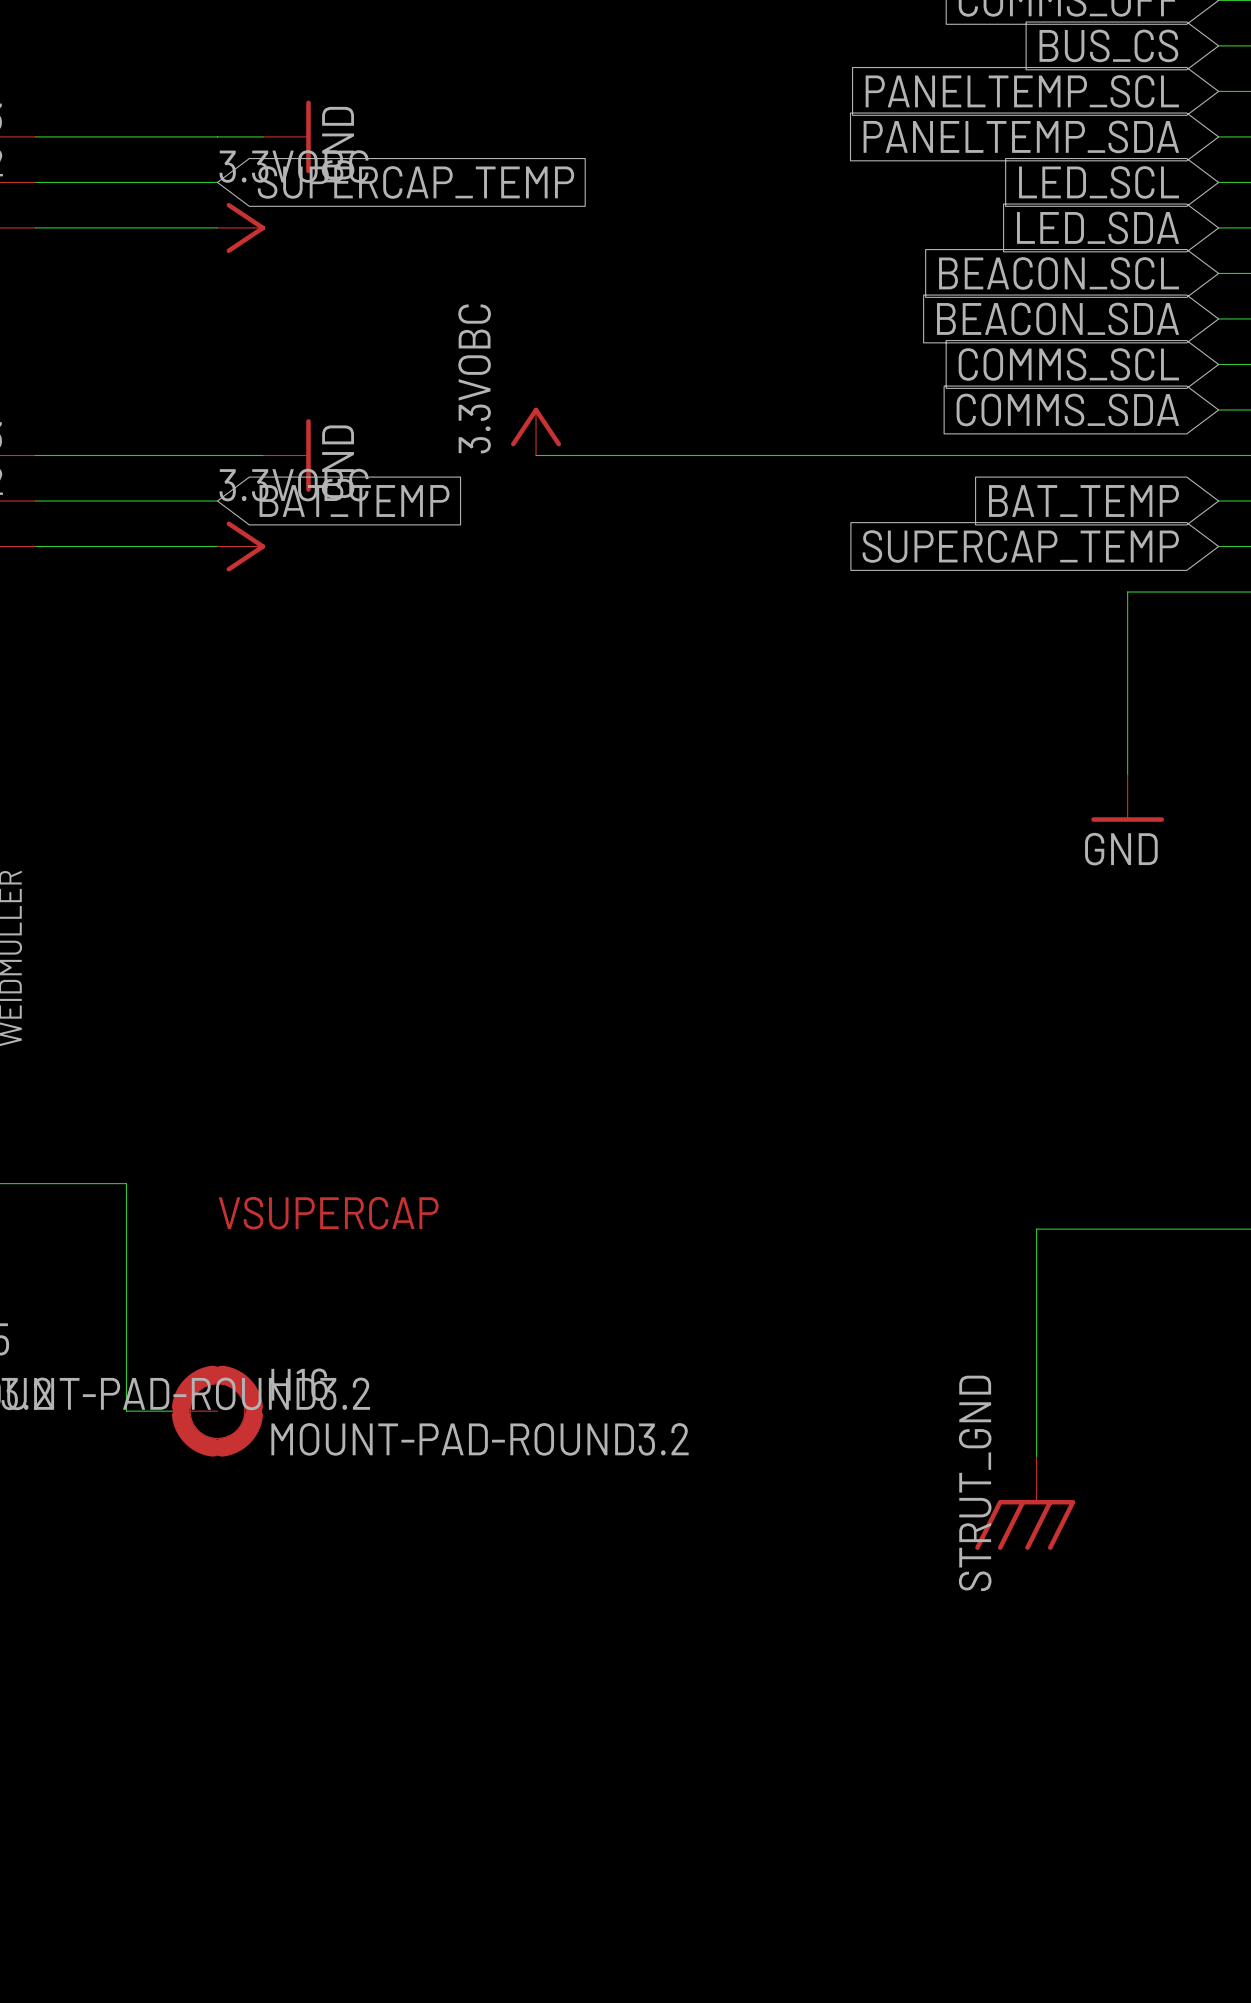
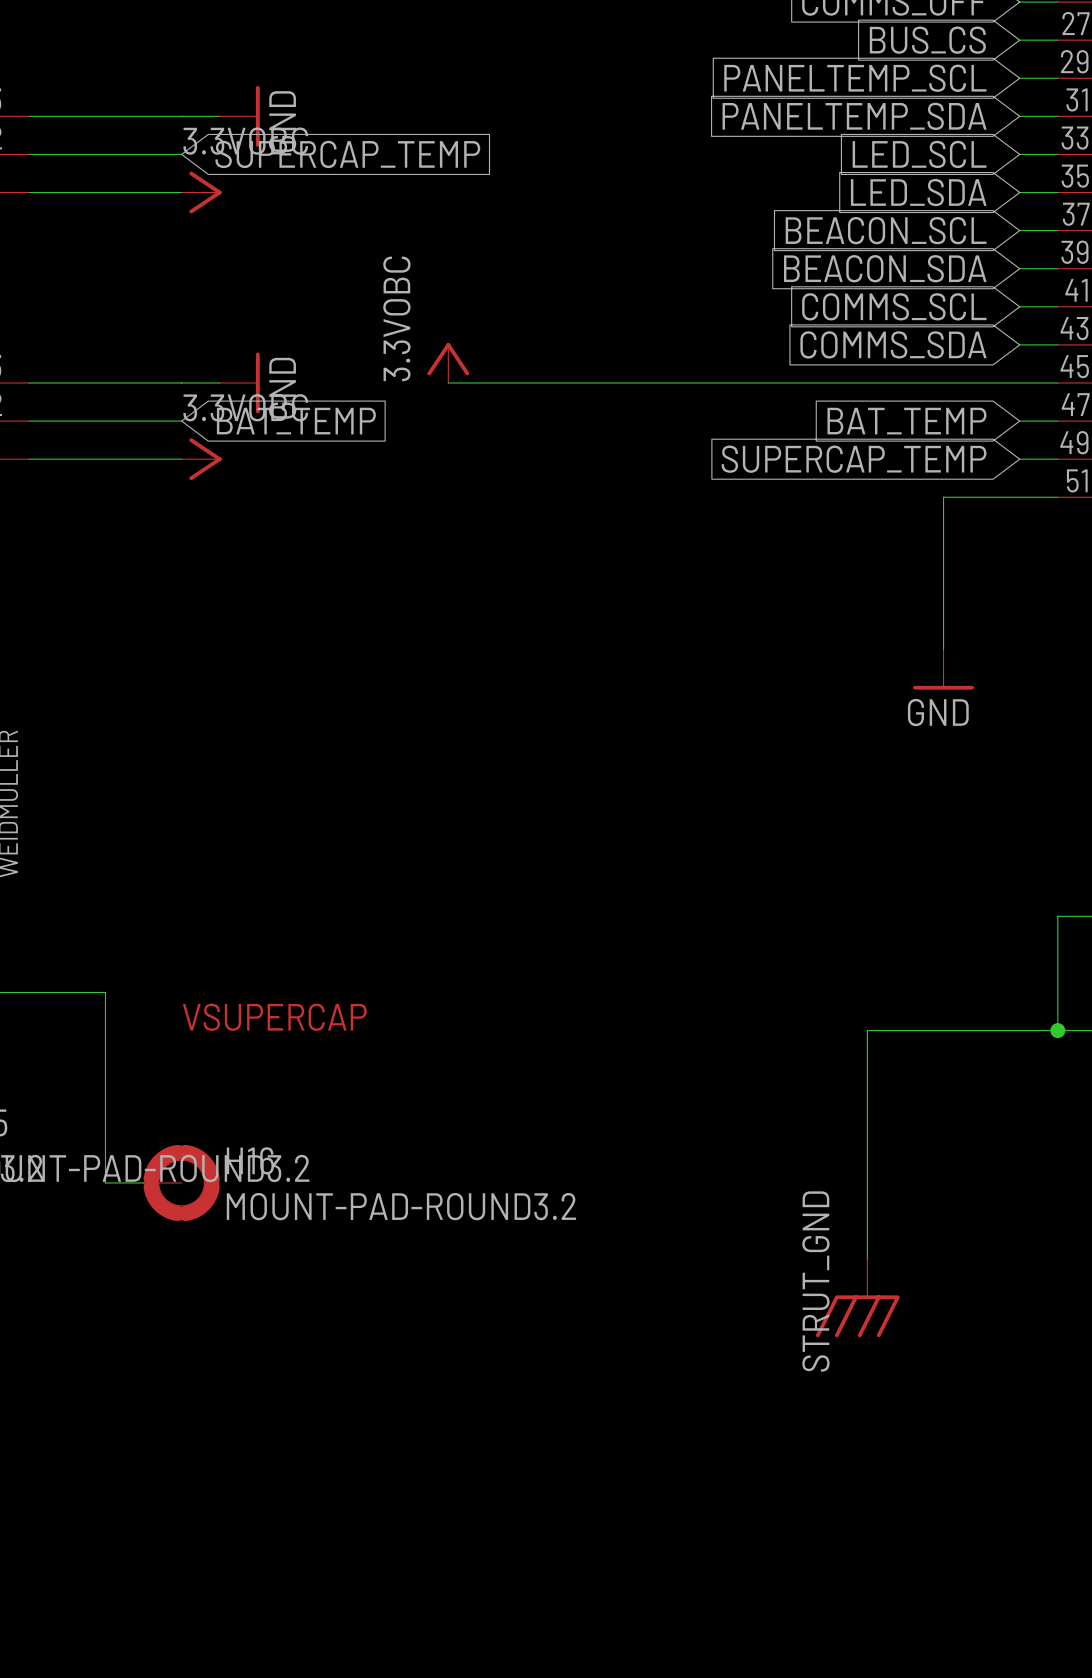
power symbol position: STRUT_GND (1025, 1503) -> STRUT_GND (857, 1298)

